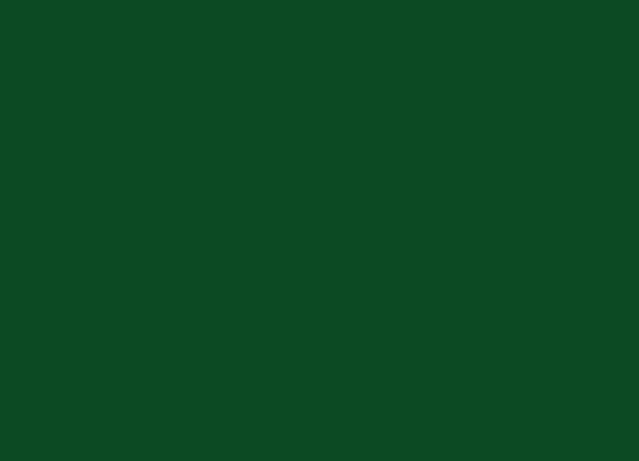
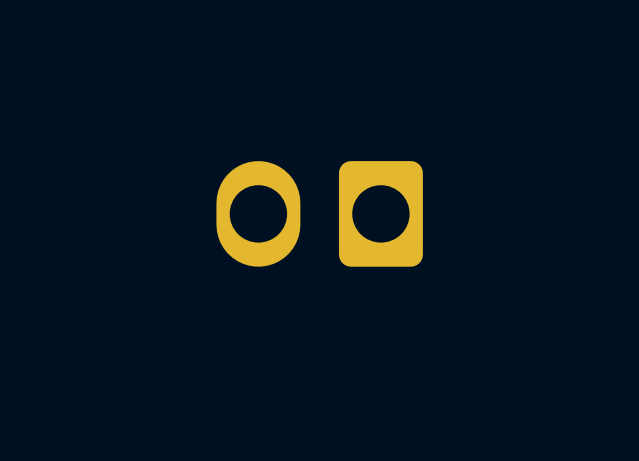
part: none -> (319, 213)

